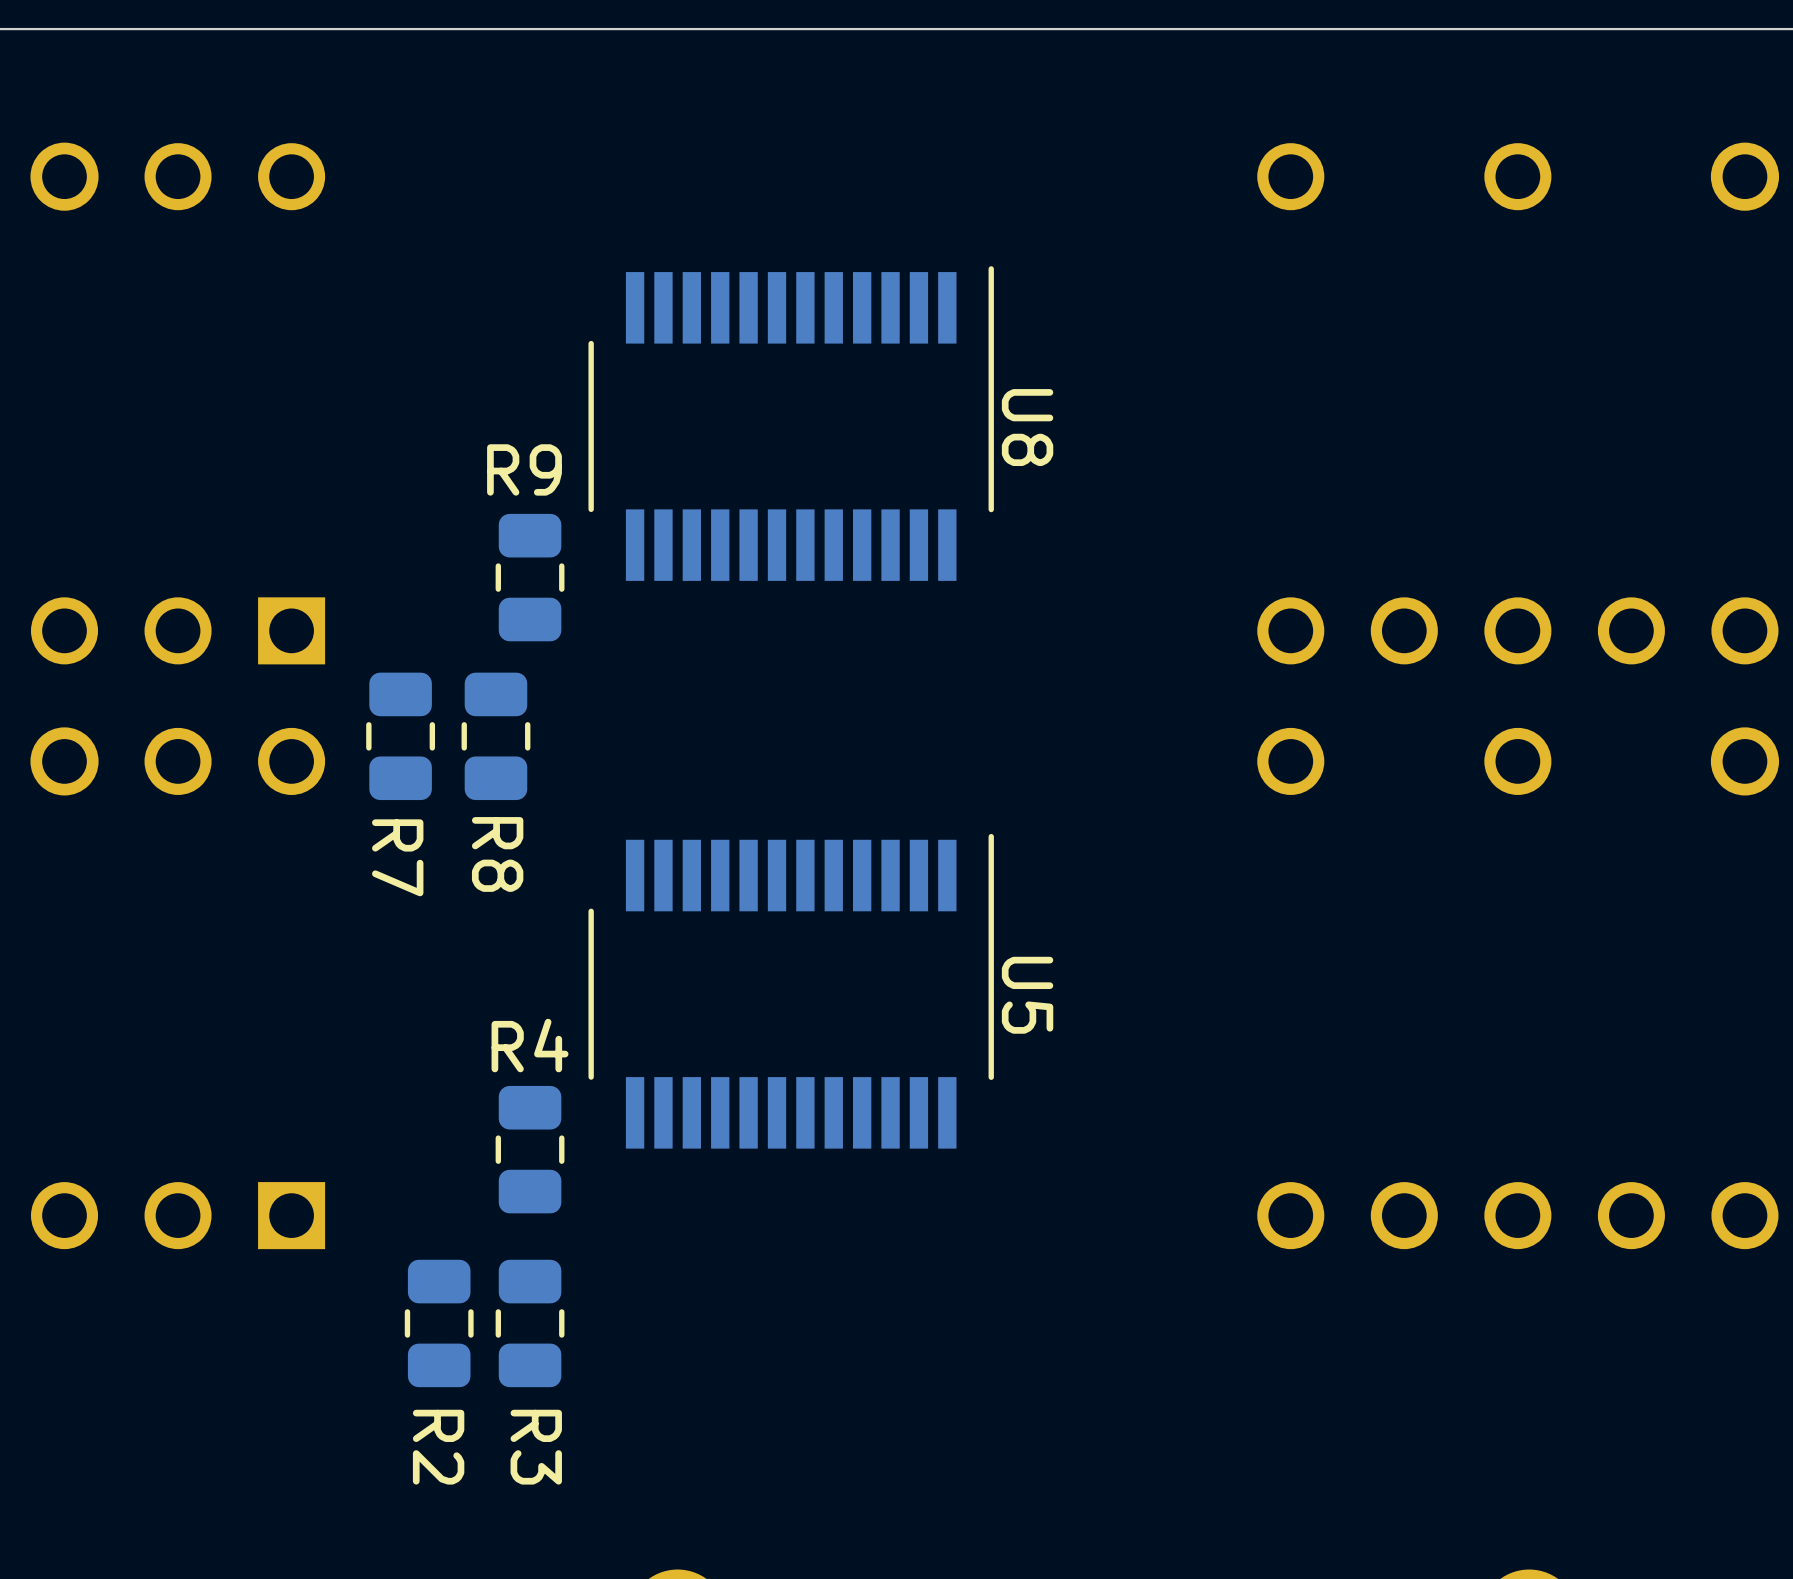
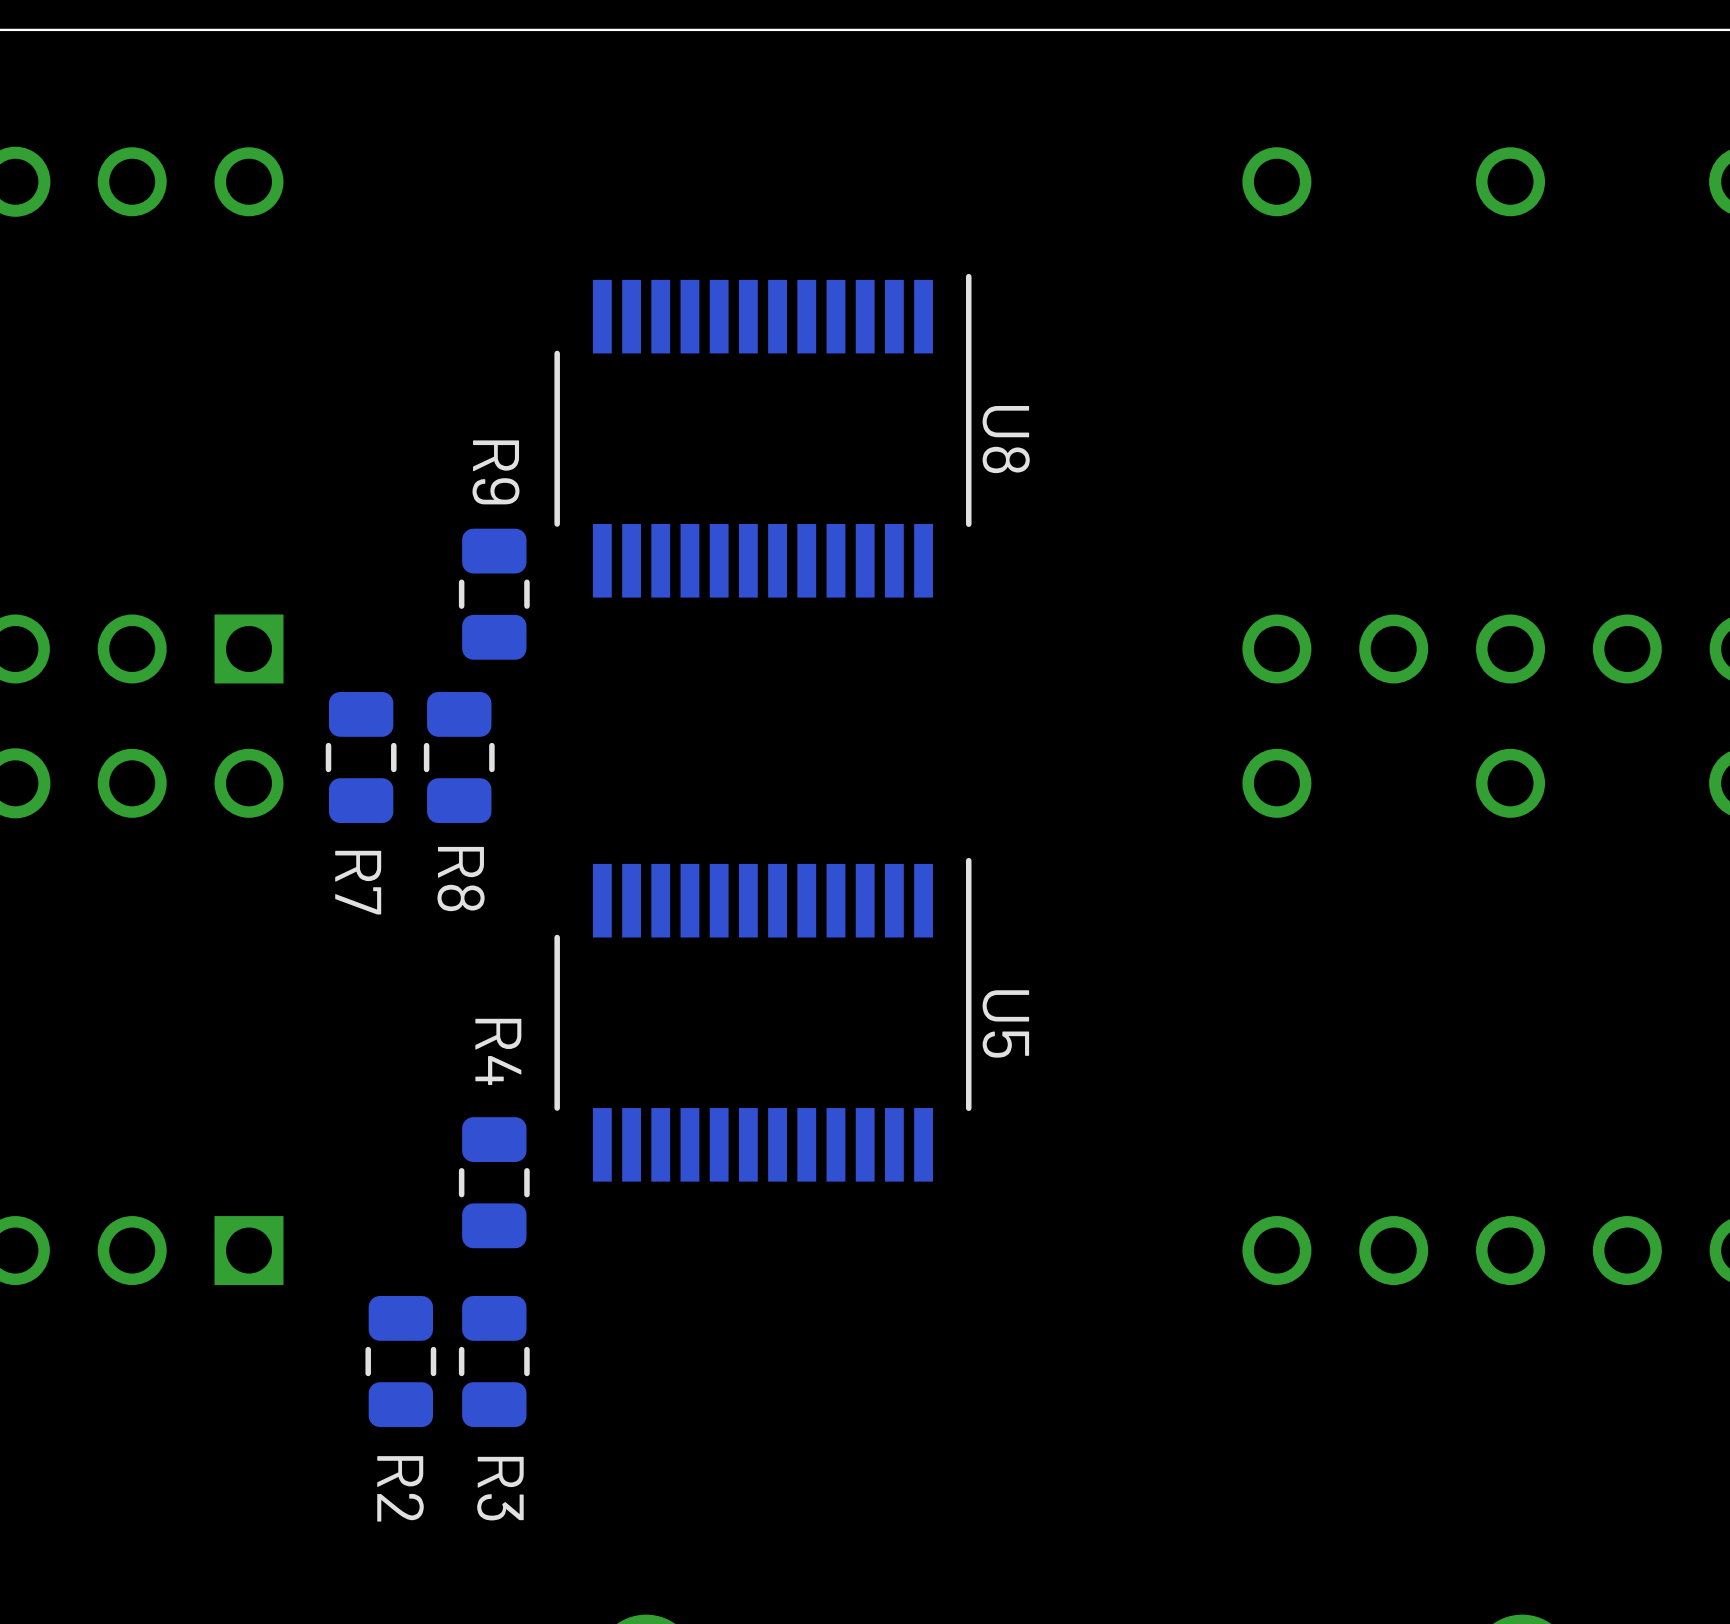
R9 name rotation: 0° (524, 469) -> 90° clockwise (495, 472)
R4 name rotation: 0° (530, 1045) -> 90° clockwise (498, 1051)

